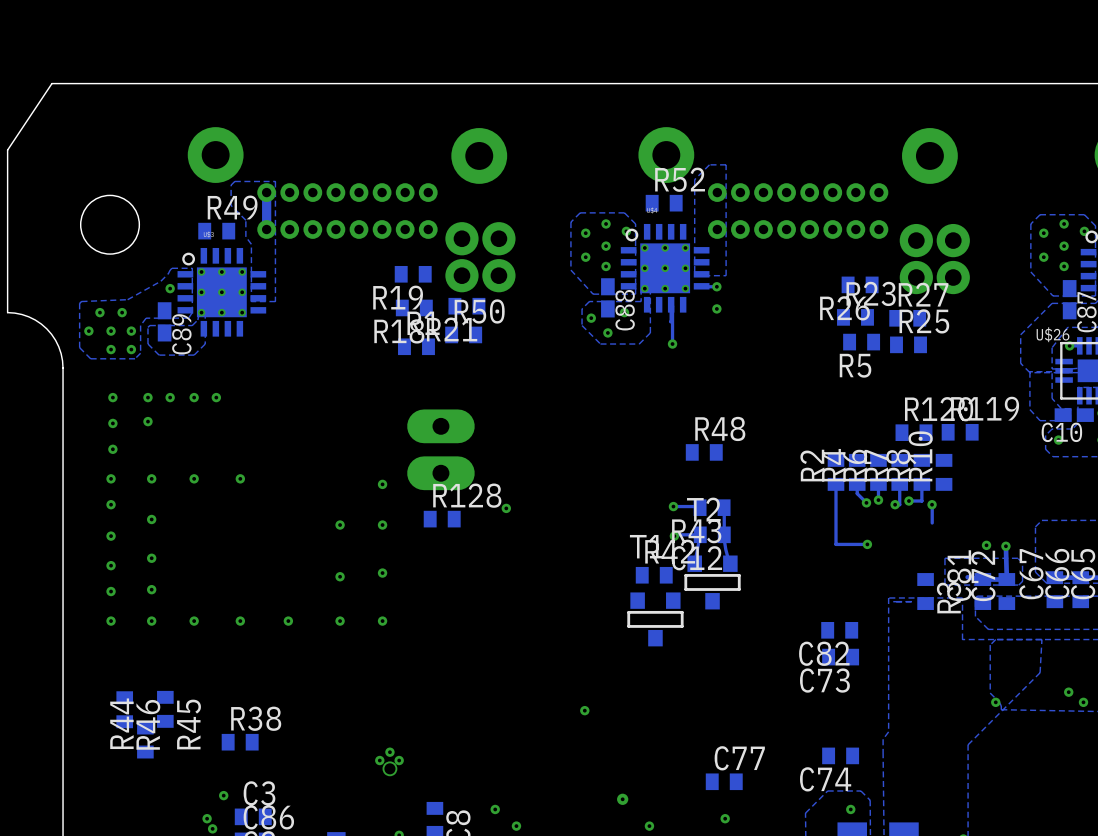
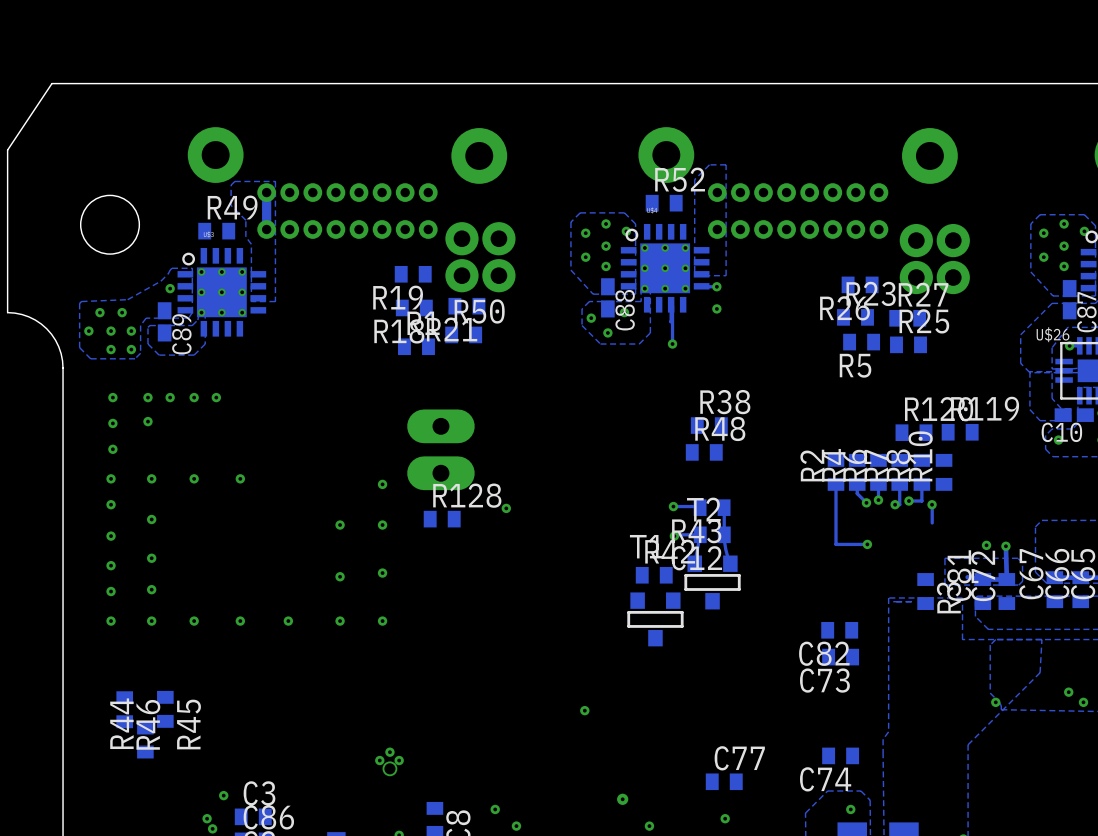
R38 position: (240, 742) -> (709, 425)

